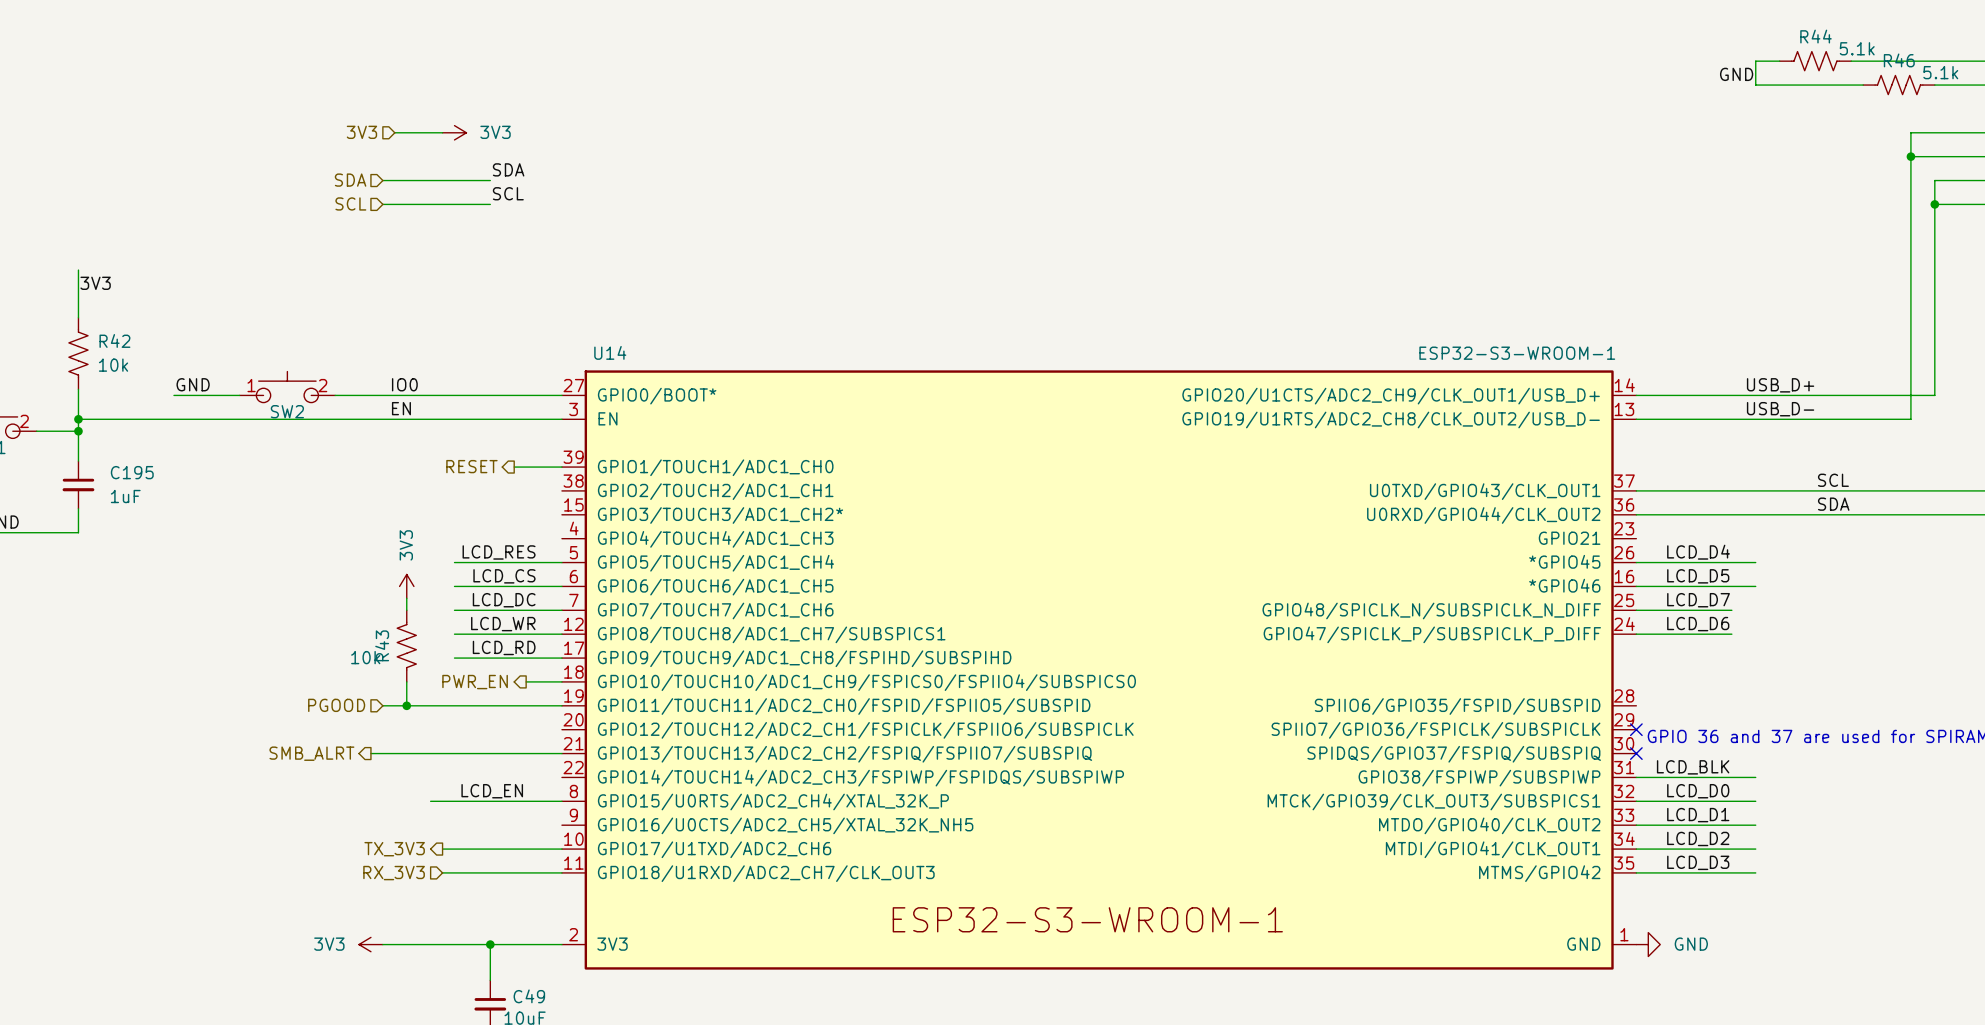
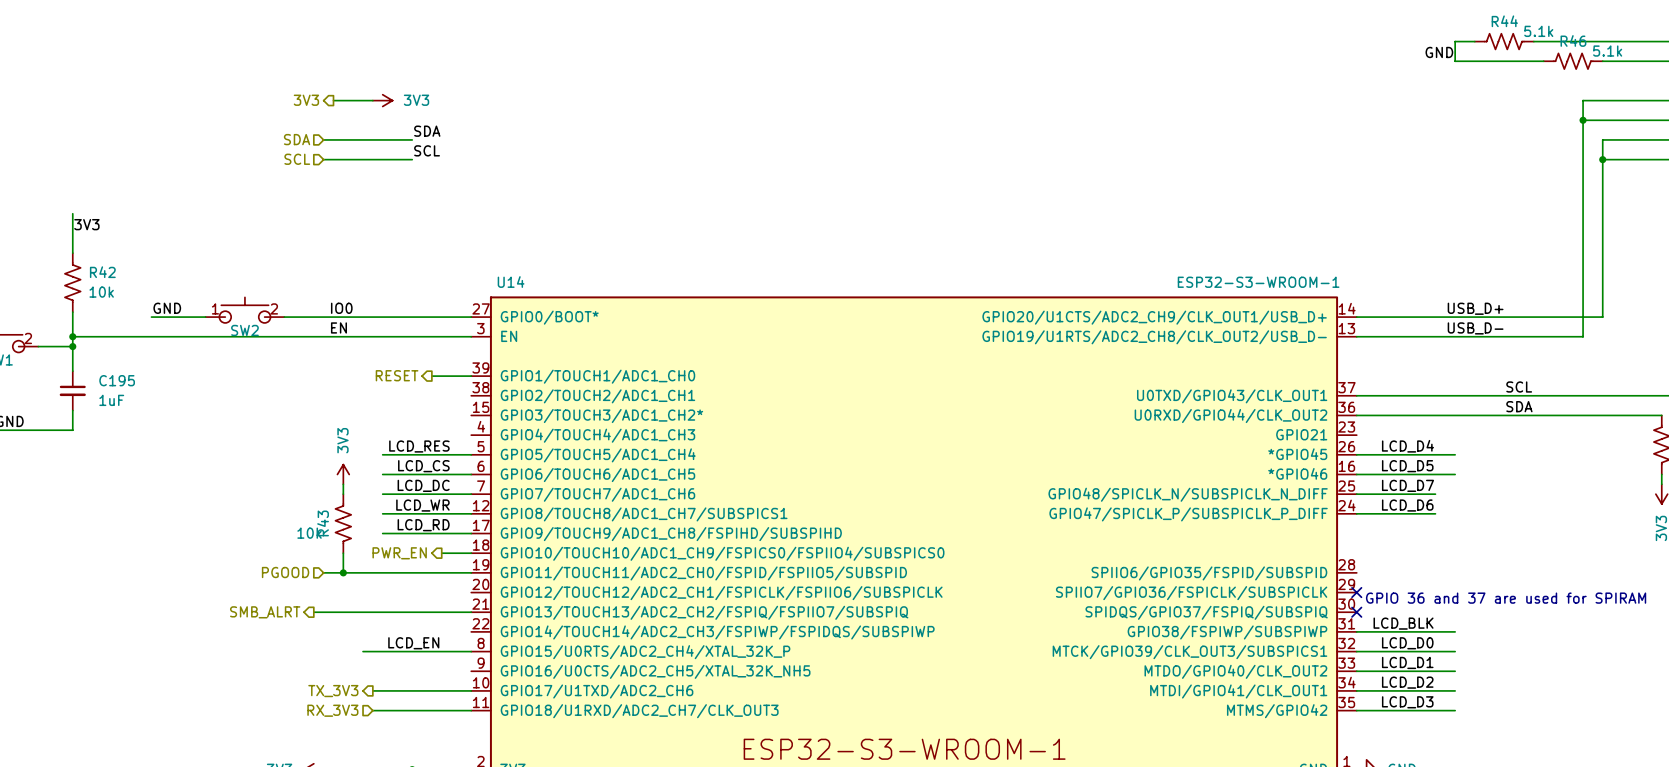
hierarchical label shape: input (361, 132) -> output (306, 100)

